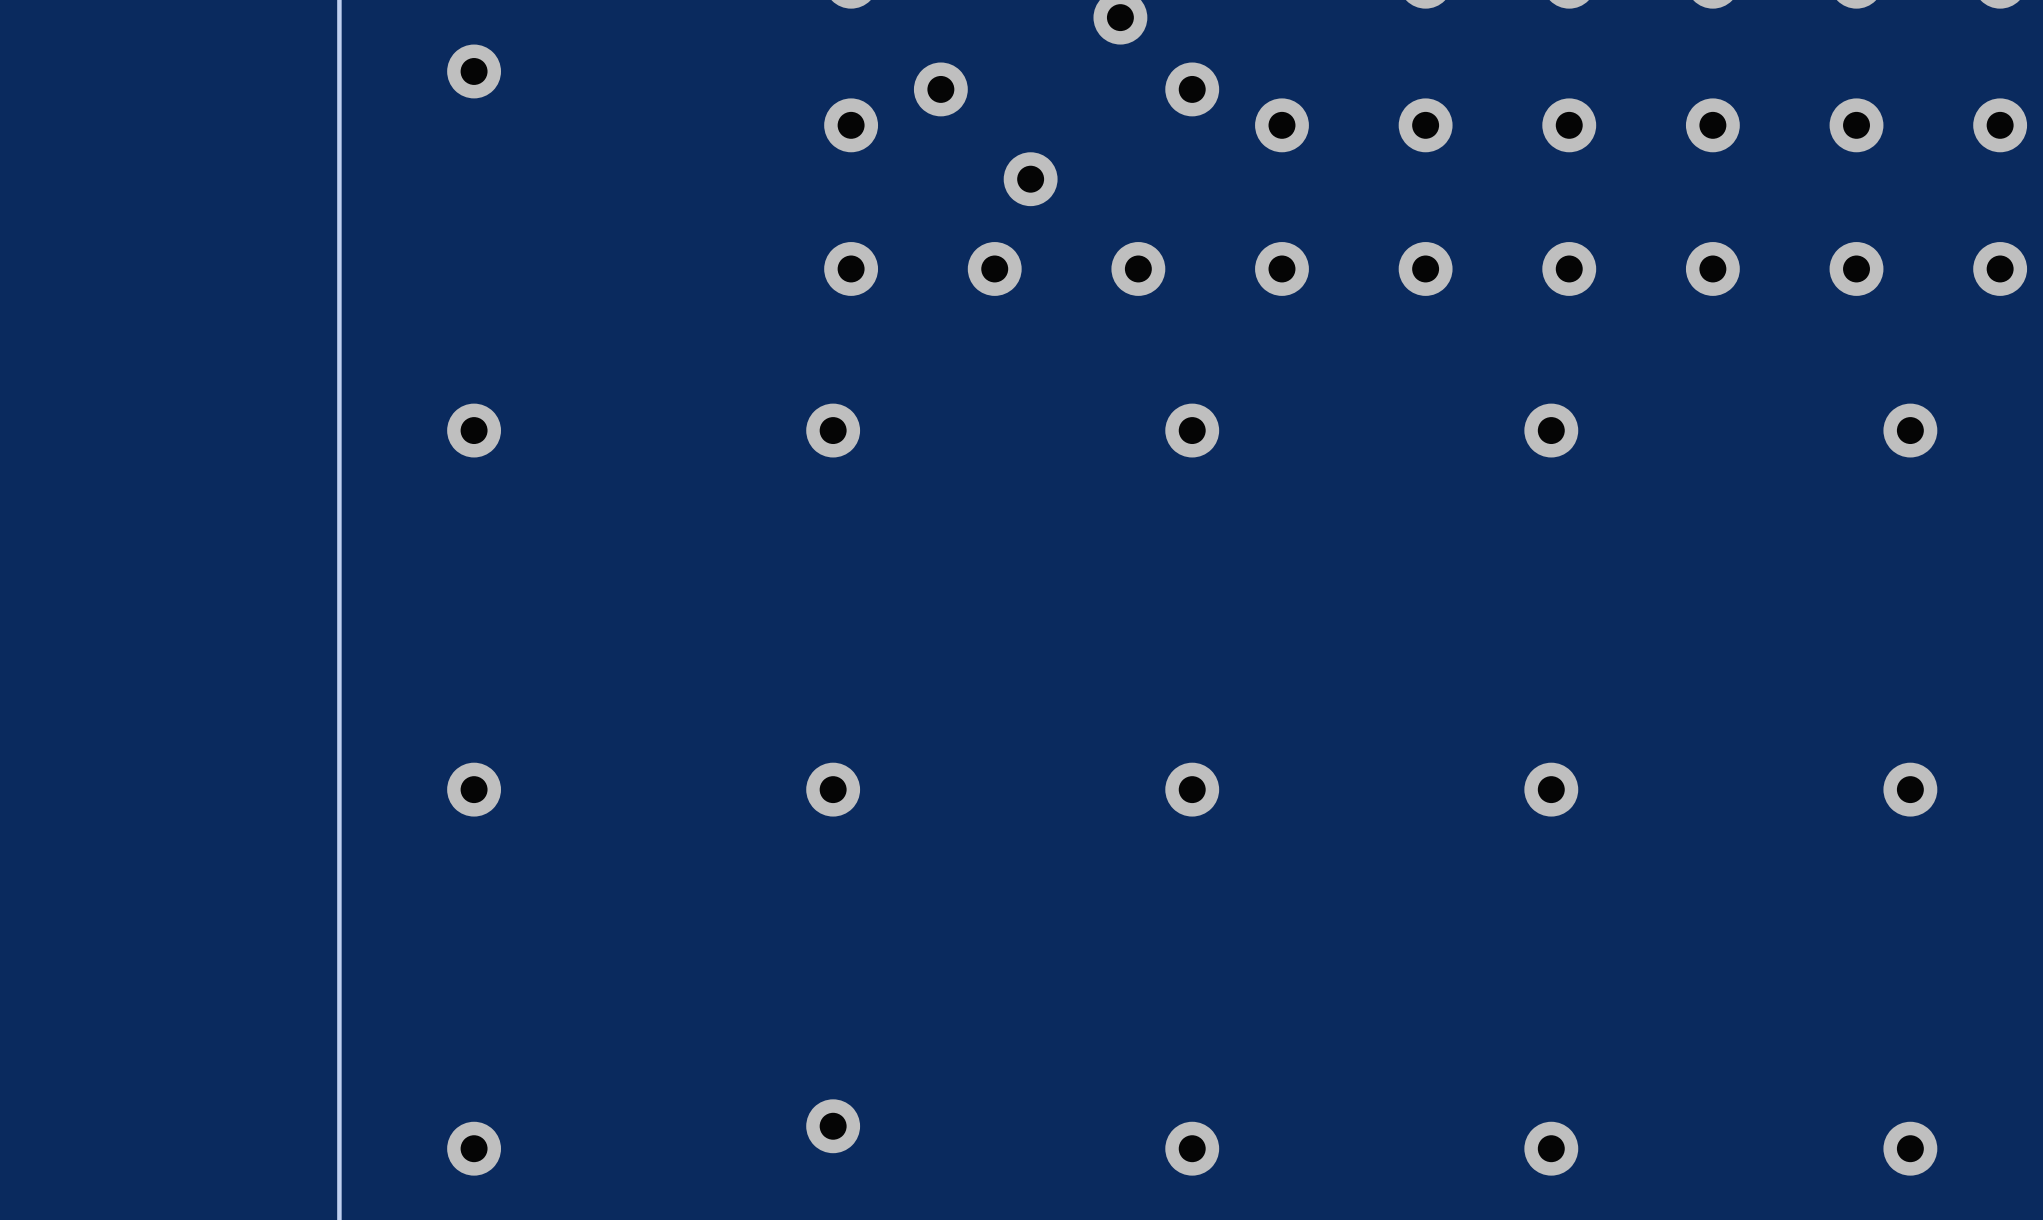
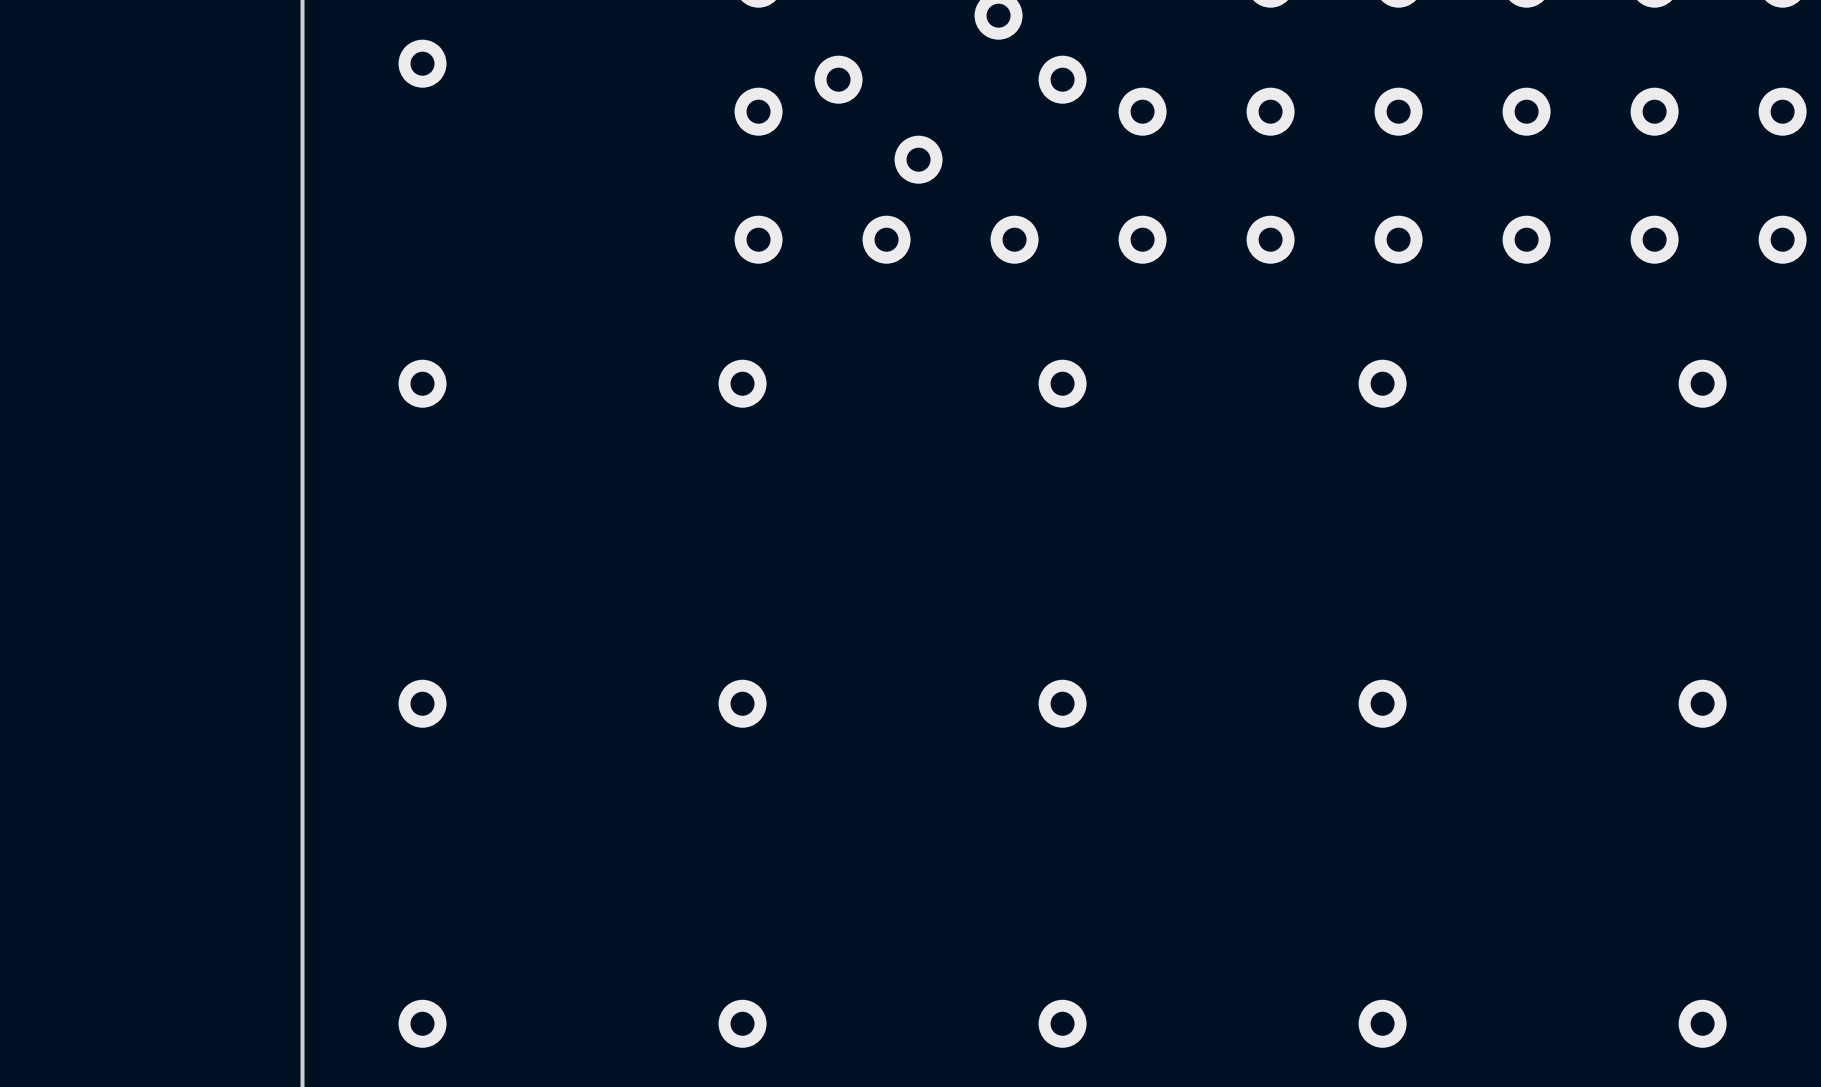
via position: (833, 1126) -> (742, 1023)

